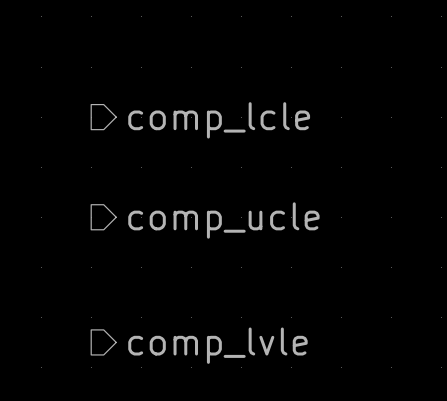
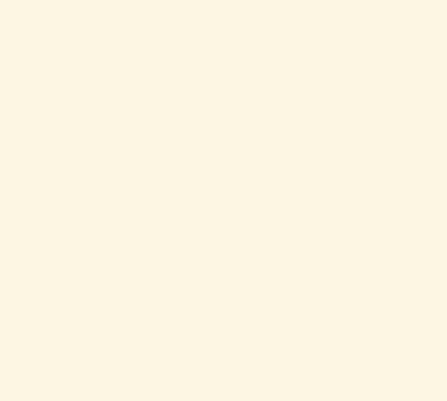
hierarchical label: comp_lcle (219, 120) -> none
hierarchical label: comp_ucle (223, 220) -> none
hierarchical label: comp_lvle (217, 345) -> none

